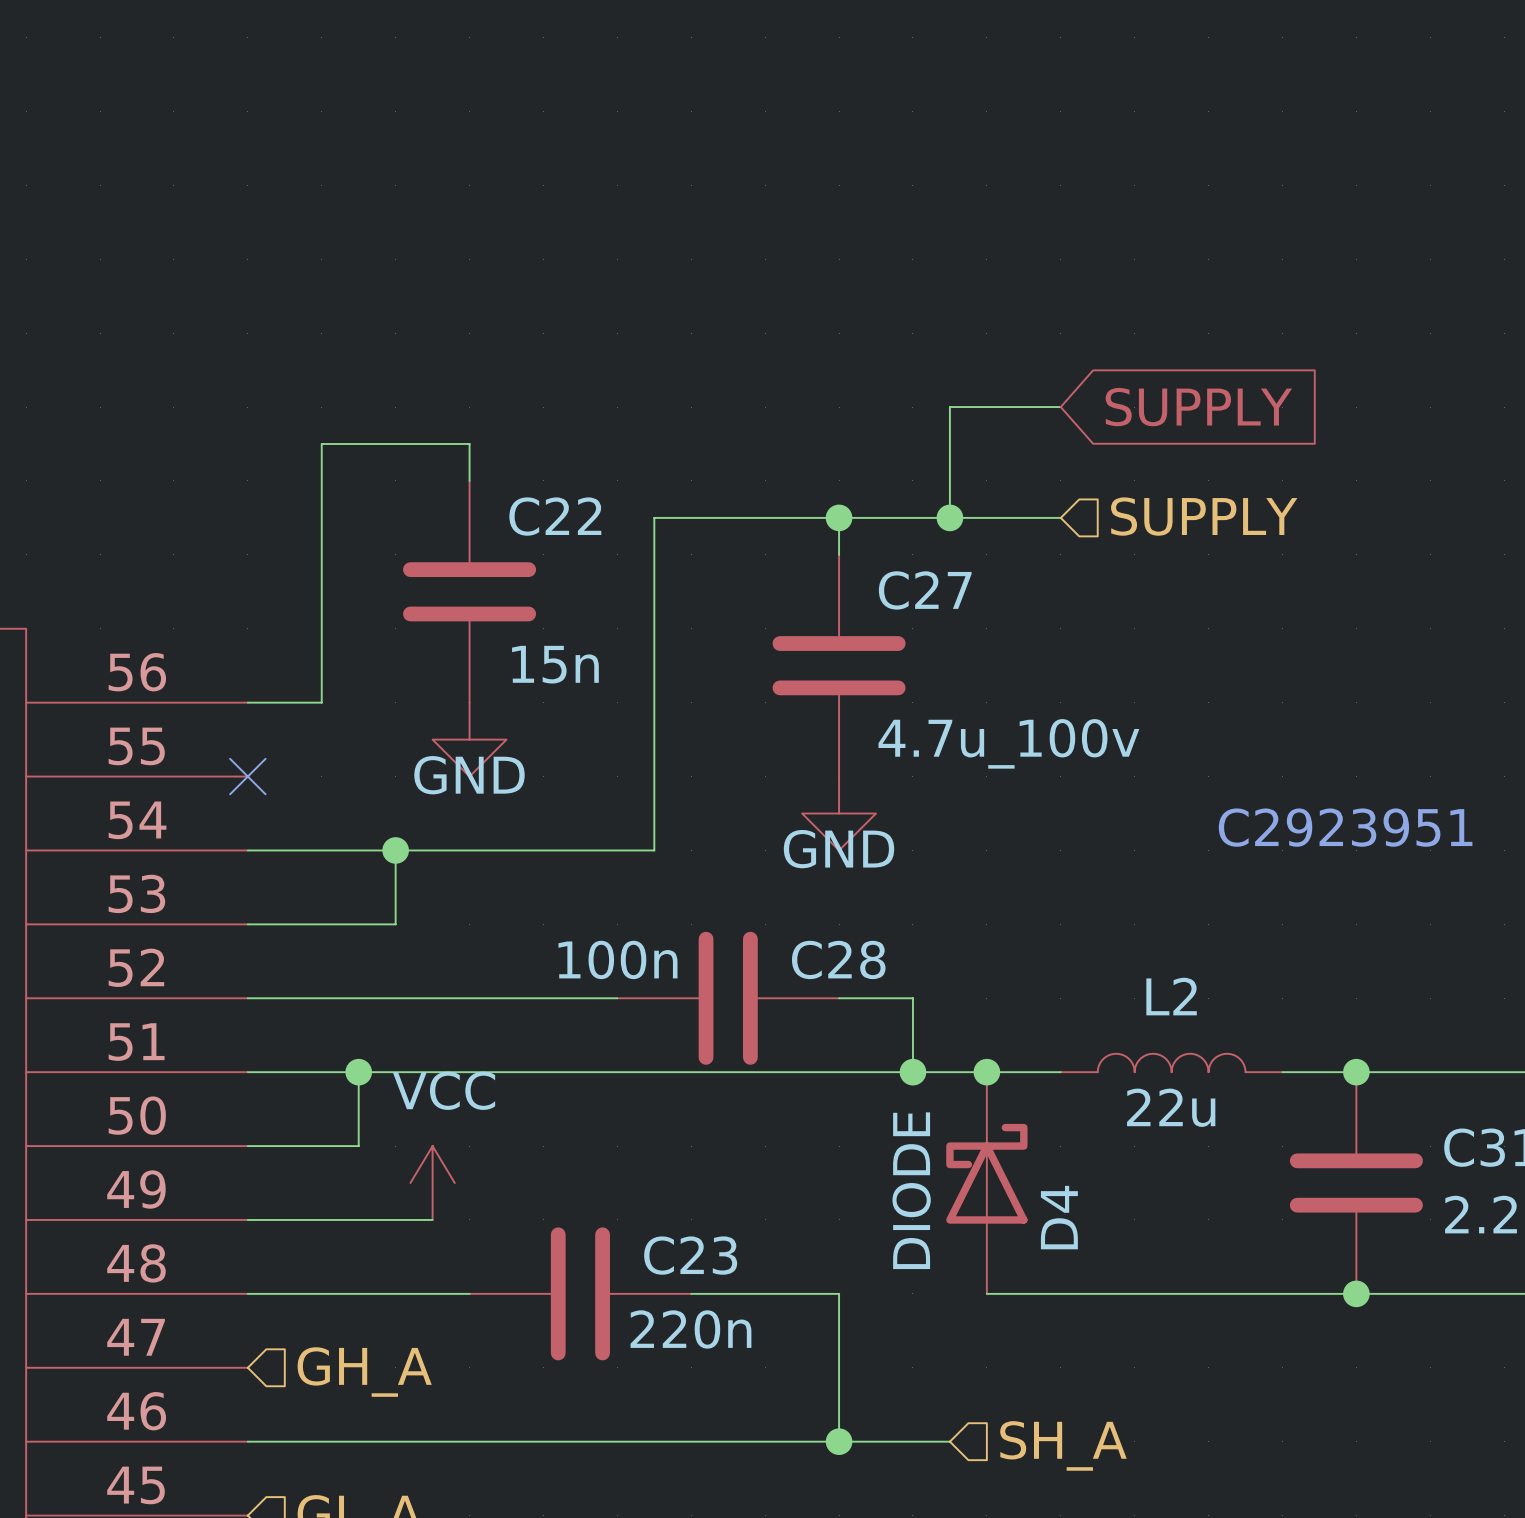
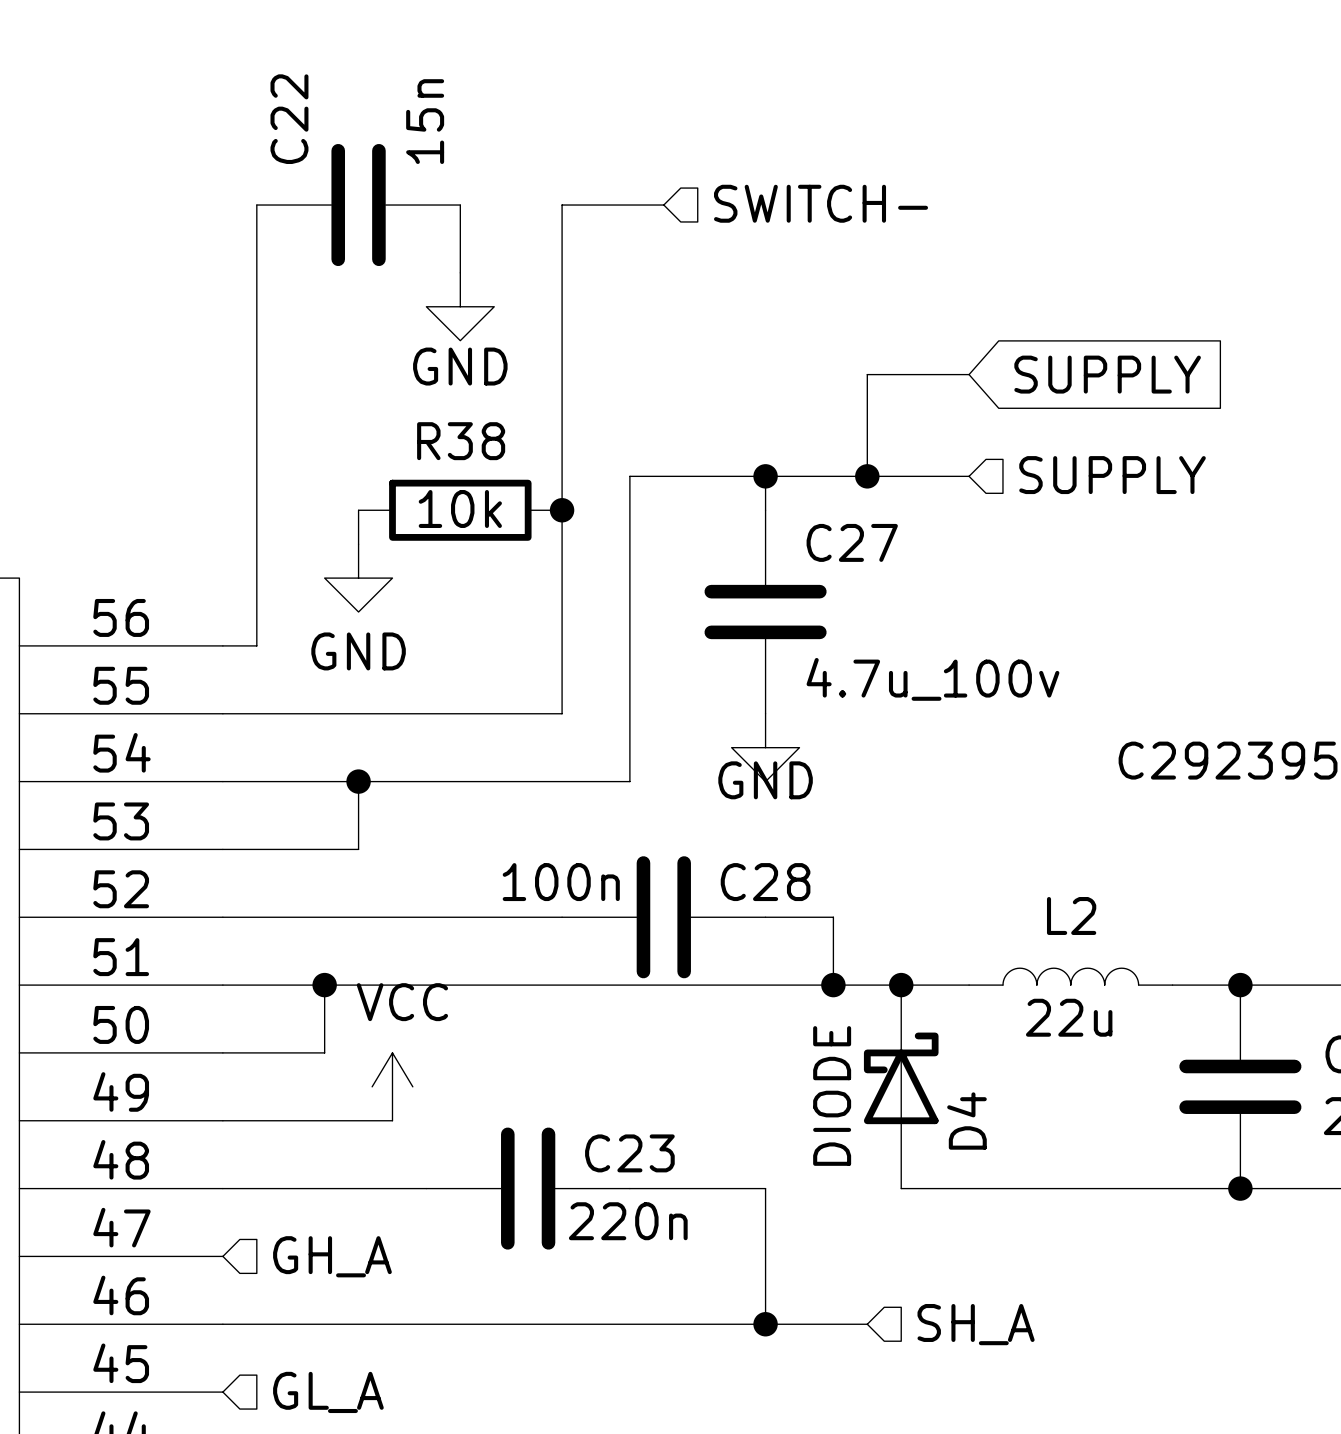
hierarchical label: none -> SWITCH- (821, 203)
wire: none -> (460, 205) (460, 272)
wire: none -> (663, 205) (562, 205) (562, 713) (222, 713)
power symbol: none -> GND (460, 306)
wire: (469, 480) (469, 444) (321, 444) (321, 702) (284, 702) -> (256, 205) (256, 645)
C22 name position: C22 (555, 516) -> C22 (289, 119)
wire: (691, 517) (654, 517) (654, 850) -> (629, 476) (629, 781) (595, 781)
wire: none -> (358, 510) (358, 544)
R38: none -> 10k (460, 510)
junction: none -> (562, 510)
C22 rotation: 0° (469, 591) -> 90° clockwise (358, 205)
C22 position: (469, 591) -> (358, 205)
C22 value position: 15n (555, 664) -> 15n (425, 121)
power symbol position: GND (469, 739) -> GND (358, 578)
power symbol text position: GND (469, 775) -> GND (358, 651)
no-connect mark: (247, 776) -> none

